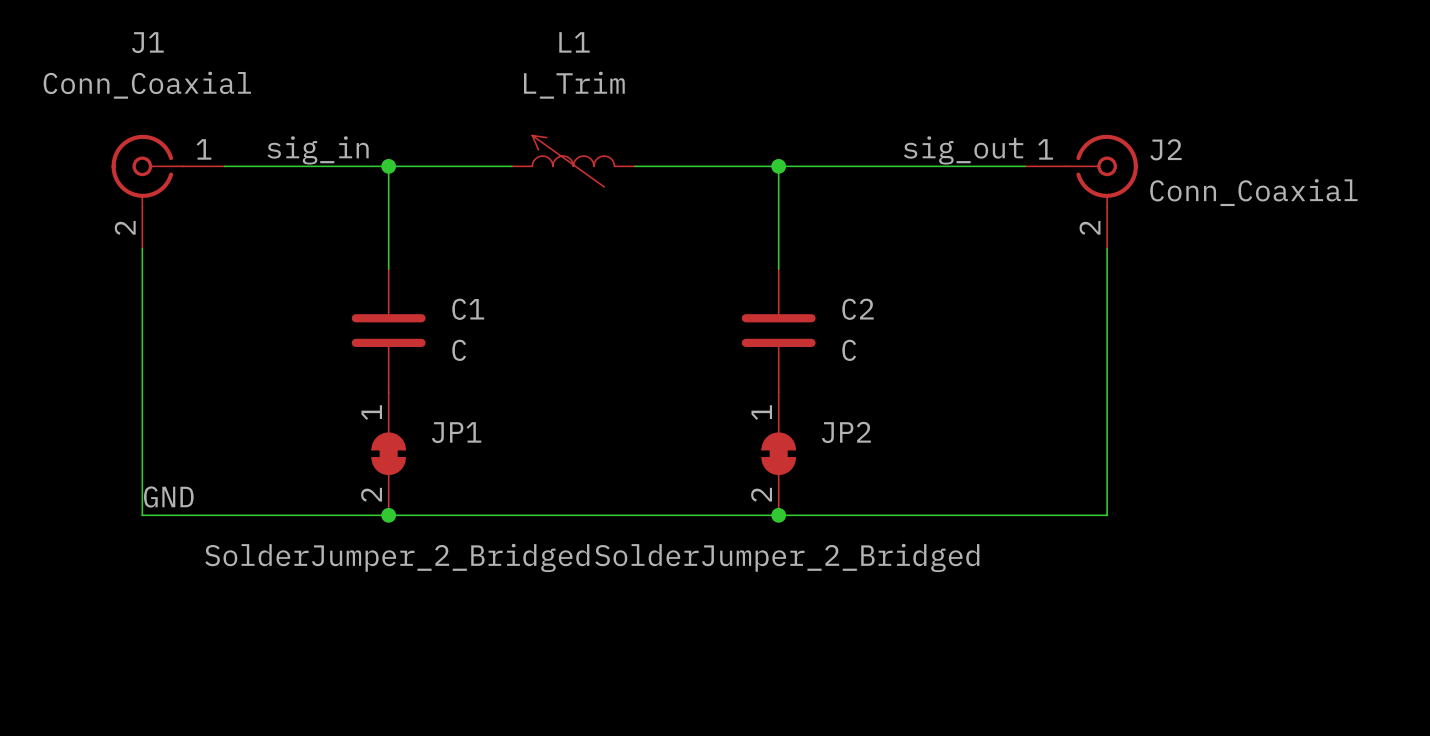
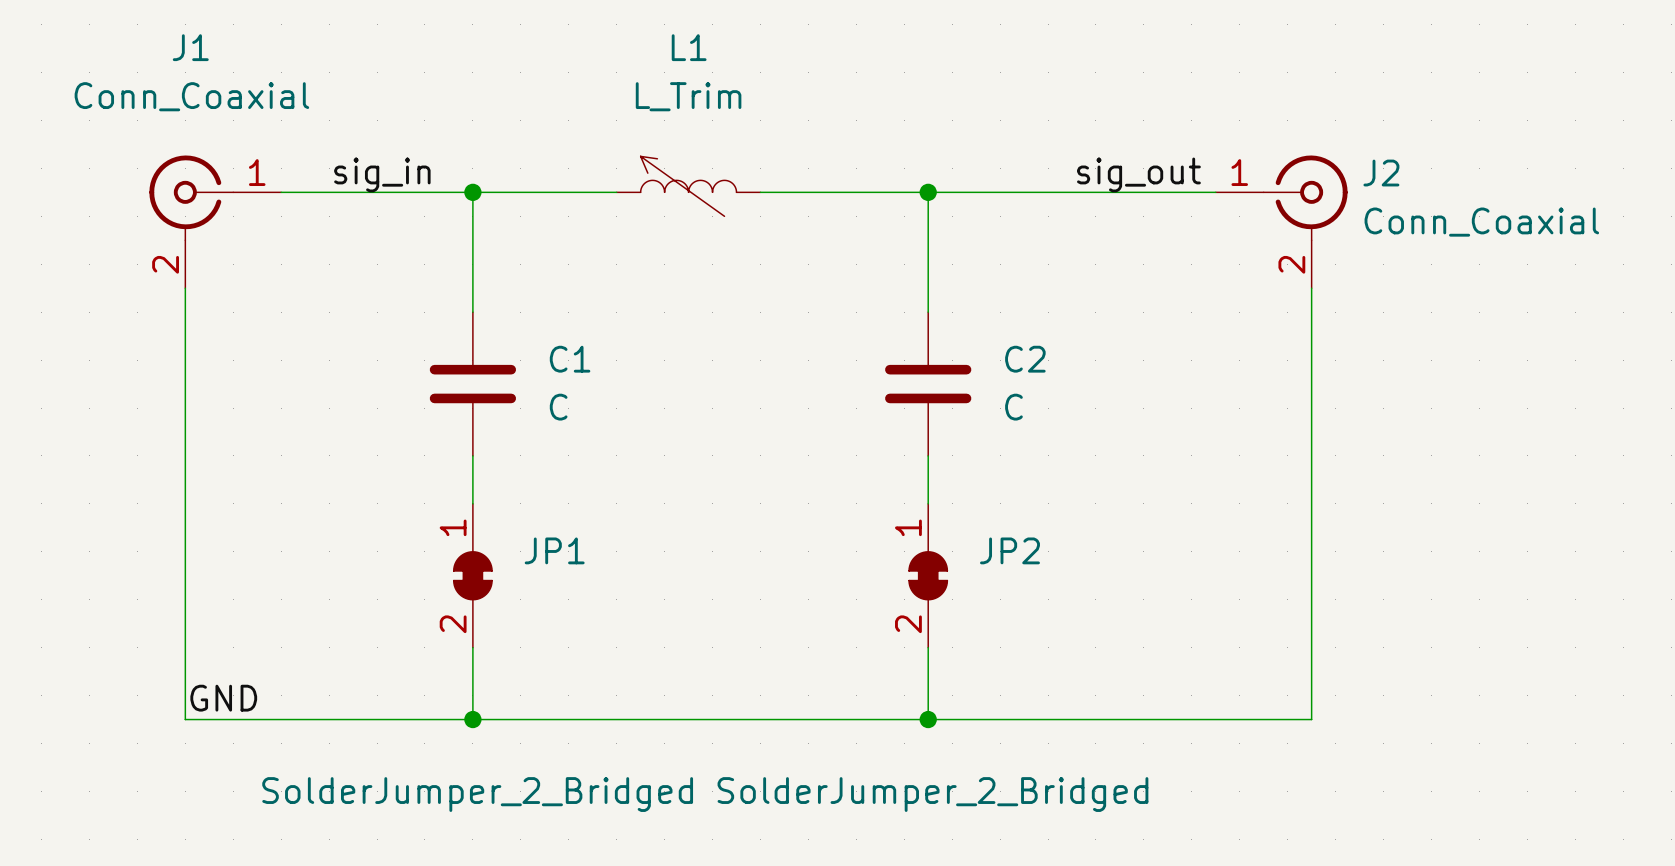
JP1 position: (388, 453) -> (472, 575)
JP2 position: (778, 453) -> (928, 575)
label position: GND (168, 496) -> GND (223, 698)
wire: (142, 515) (1107, 515) -> (185, 599) (185, 719) (1311, 719) (1311, 599)
junction: (388, 515) -> none
junction: (778, 515) -> none
wire: none -> (472, 647) (472, 719)
wire: none -> (928, 647) (928, 719)
JP1 value position: SolderJumper_2_Bridged (397, 557) -> SolderJumper_2_Bridged (477, 794)
JP2 value position: SolderJumper_2_Bridged (787, 557) -> SolderJumper_2_Bridged (932, 794)
junction: none -> (472, 719)
junction: none -> (928, 719)

